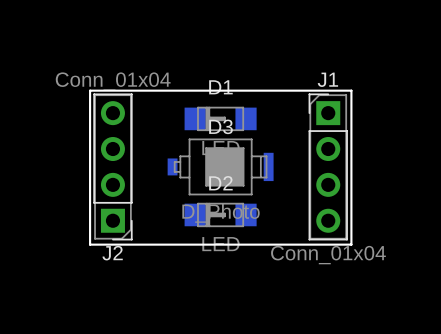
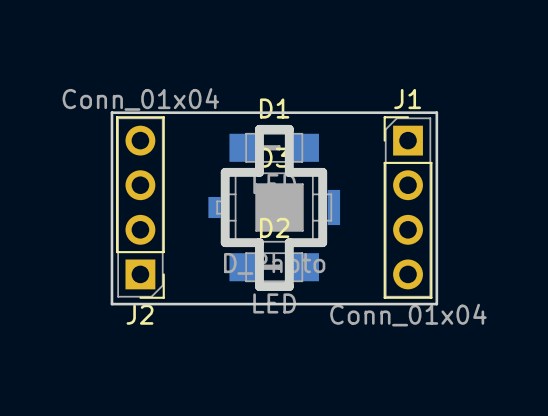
board edge: none -> (289, 129) (259, 129) (259, 172) (225, 172) (225, 242) (259, 242) (259, 286) (289, 286) (289, 242) (322, 242) (322, 172) (289, 172) (289, 129)

